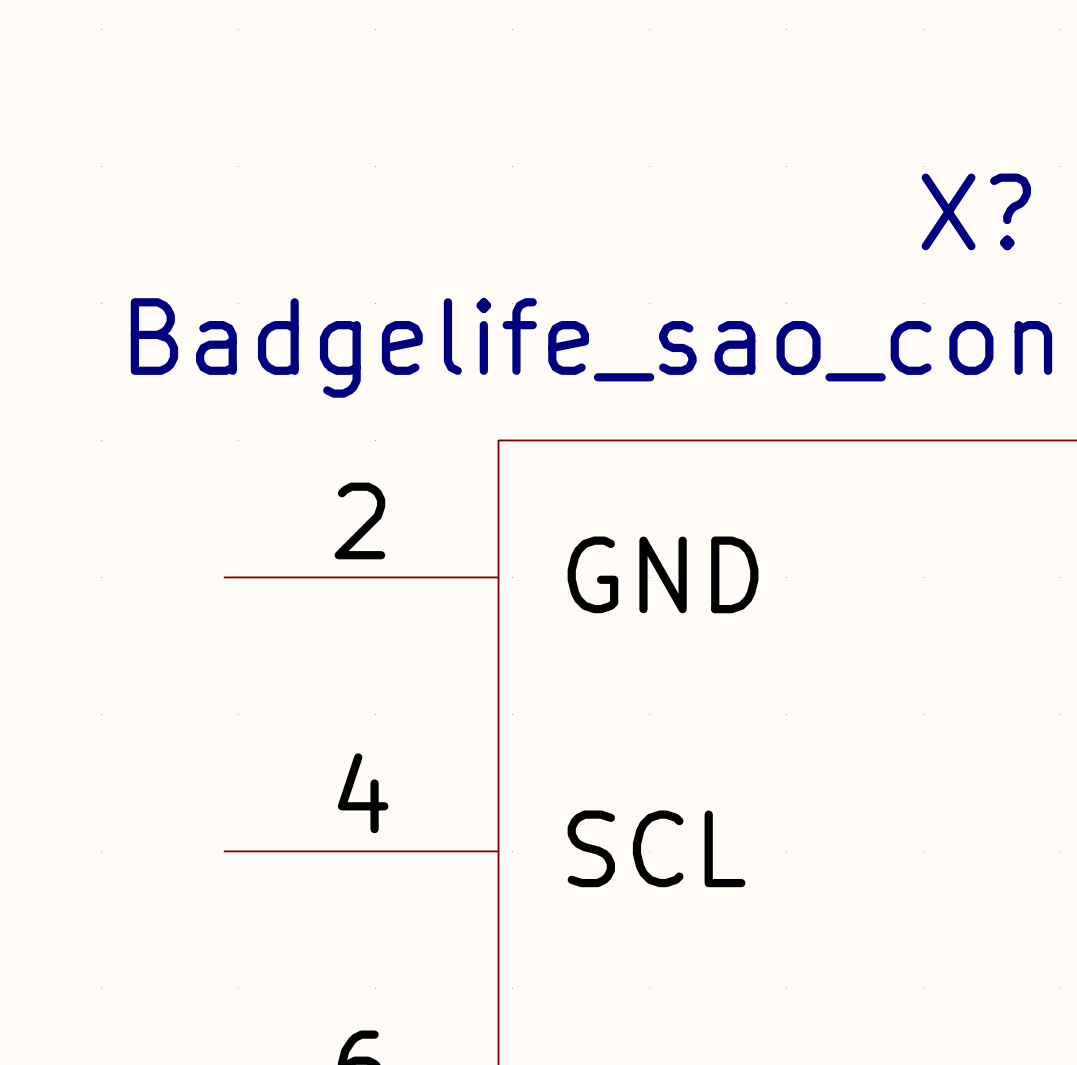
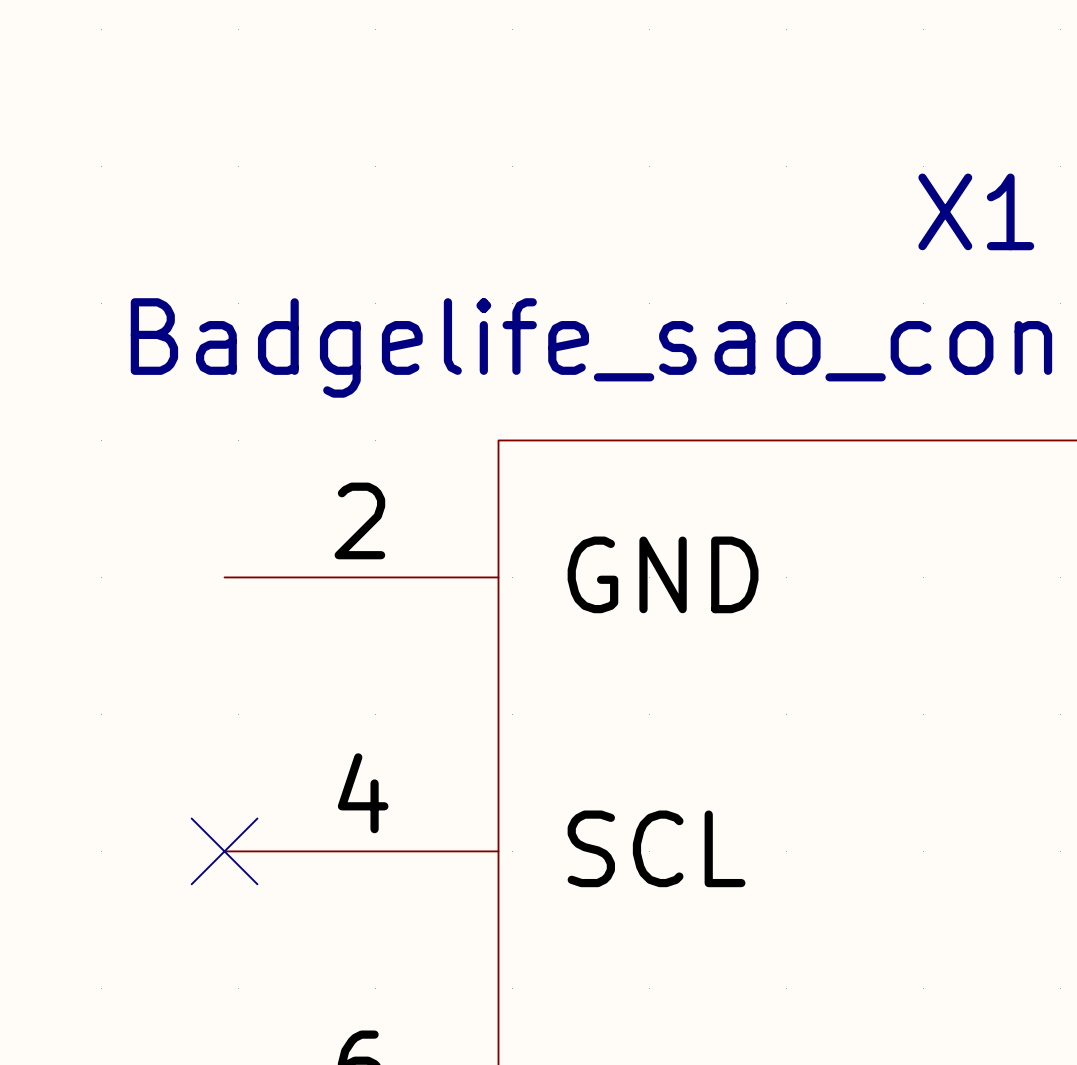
X? name: X? (976, 211) -> X1 (976, 211)
no-connect mark: none -> (224, 851)

